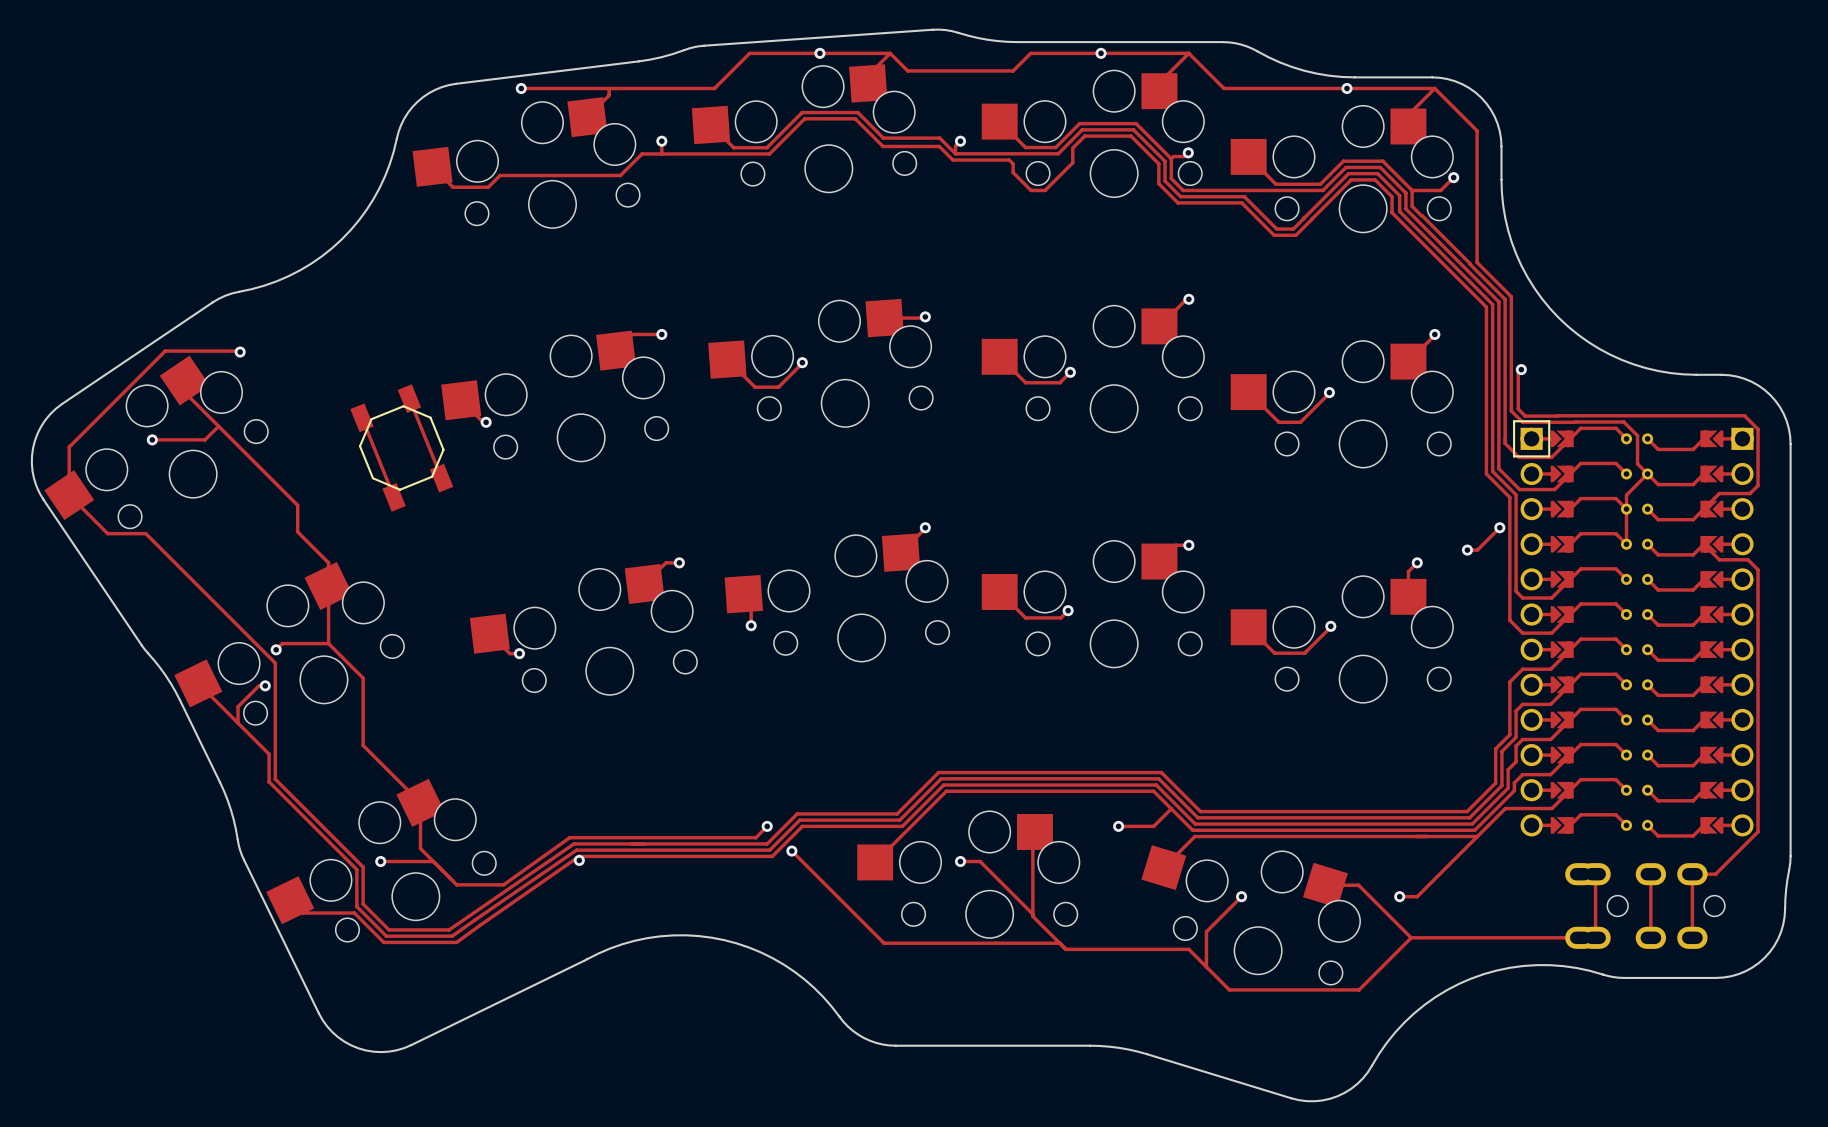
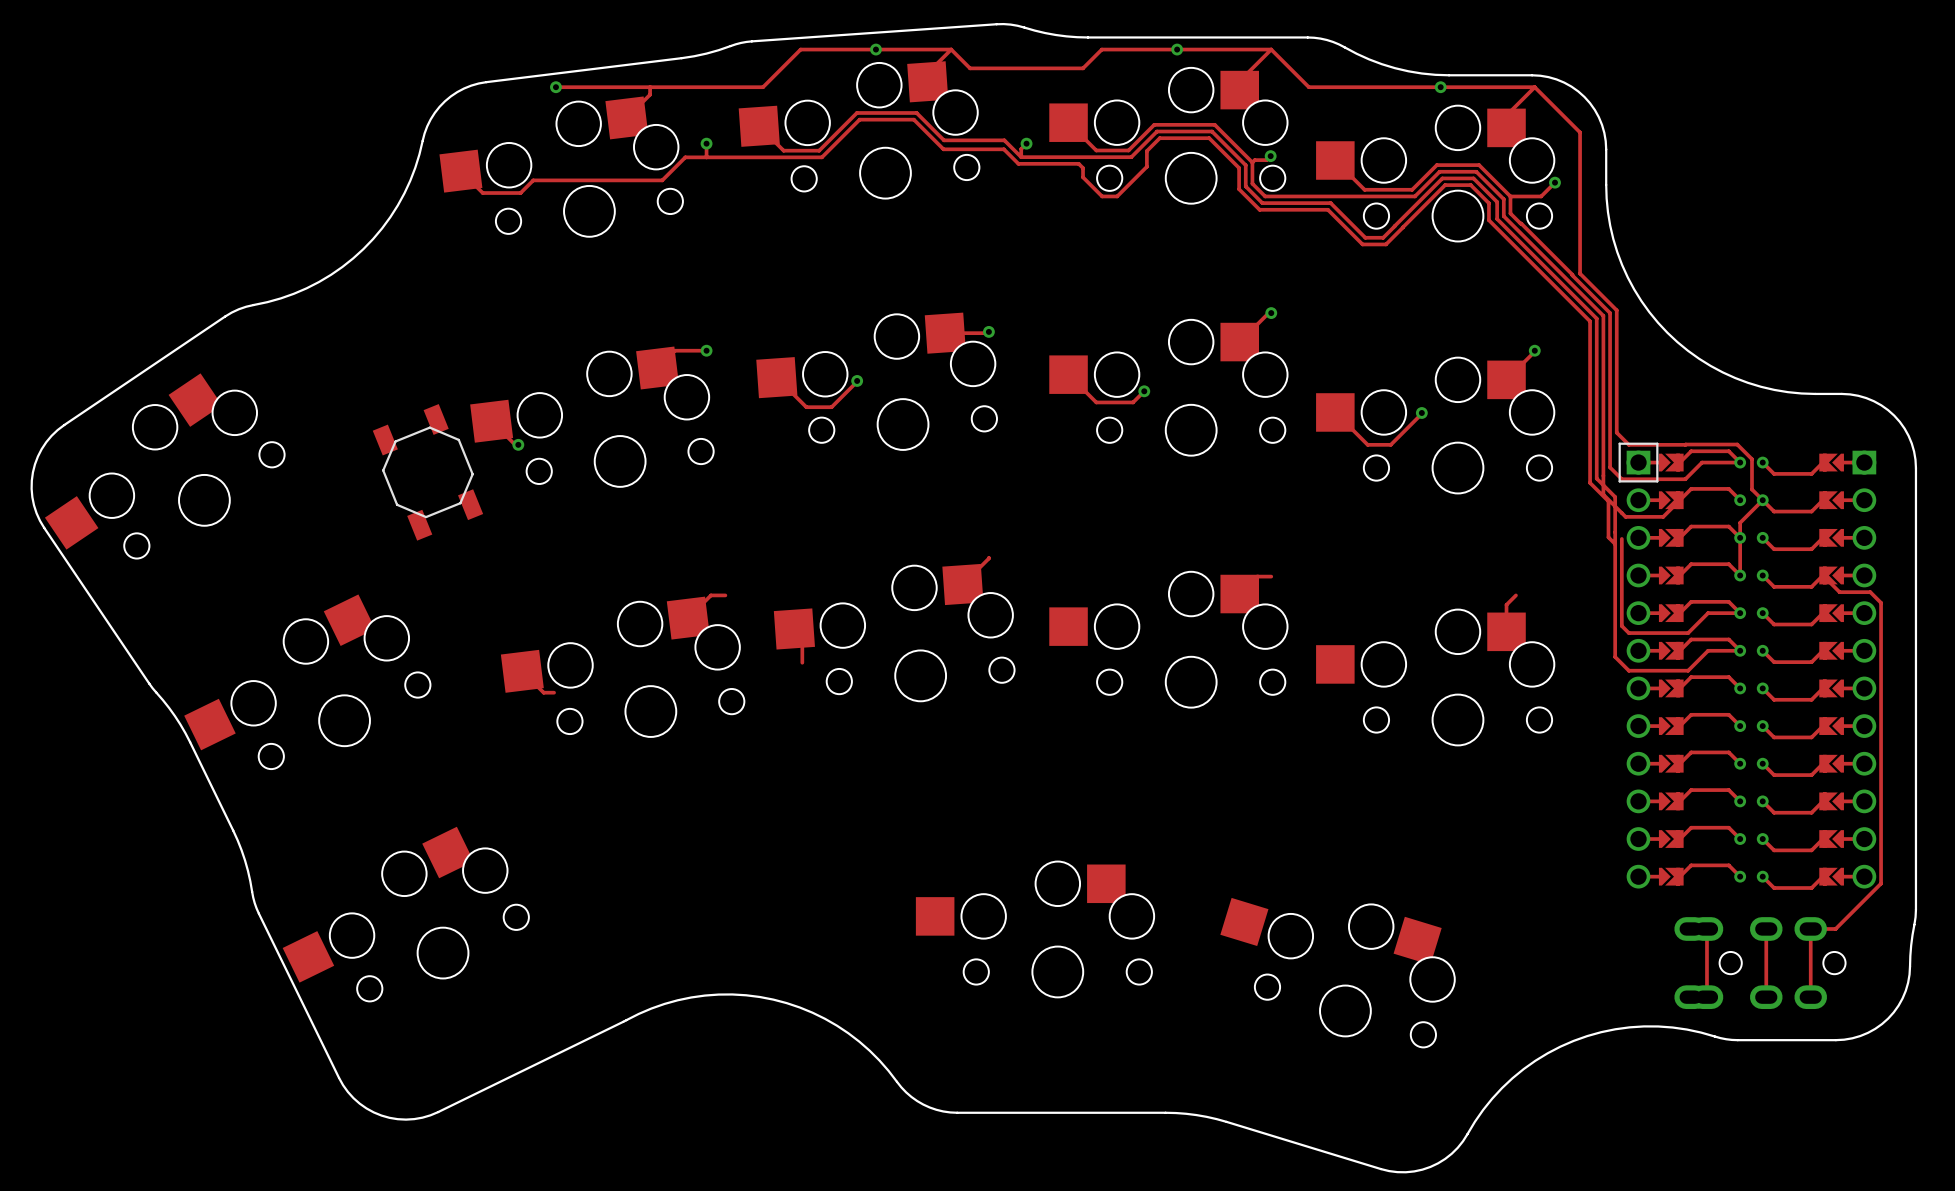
track: (240, 352) (165, 351) (69, 447) (69, 495) (107, 533) (145, 533) (275, 663) (275, 779) (363, 867) (363, 904) (388, 929) (449, 929) (573, 843) (767, 843) (797, 813) (897, 813) (938, 772) (1161, 772) (1200, 811) (1467, 811) (1495, 783) (1495, 748) (1509, 734) (1509, 682) (1522, 669) (1550, 669) (1570, 649) -> none
via: (240, 352) -> none
track: (1521, 369) (1518, 372) (1518, 409) (1525, 416) (1744, 415) (1758, 429) (1758, 485) (1750, 493) (1719, 493) (1703, 509) -> none
via: (1521, 369) -> none
track: (184, 380) (184, 392) (297, 505) (297, 531) (328, 562) (328, 643) -> none
track: (409, 398) (441, 478) -> none
track: (361, 417) (394, 497) -> none
track: (218, 426) (205, 439) (152, 439) -> none
track: (1570, 438) (1551, 457) (1519, 457) (1516, 454) -> (1740, 462) (1702, 462) (1685, 479) (1621, 479)
via: (152, 439) -> none
track: (1492, 453) (1492, 471) (1516, 494) (1516, 510) -> none
track: (1486, 457) (1486, 473) (1509, 497) -> (1596, 478) (1615, 497) (1615, 525)
track: none -> (1590, 482) (1608, 501) (1608, 537) (1615, 544)
via: (925, 527) -> none
track: (1499, 527) (1477, 550) (1467, 550) -> none
via: (1499, 527) -> none
via: (1188, 545) -> none
via: (1467, 550) -> none
via: (679, 562) -> none
via: (1417, 562) -> none
track: (1570, 579) (1551, 597) -> (1740, 613) (1708, 613) (1688, 633) (1659, 633)
track: (999, 591) (1025, 617) (1060, 617) (1068, 610) -> none
via: (1068, 610) -> none
track: (1570, 614) (1551, 633) -> (1740, 650) (1708, 650) (1688, 670) (1659, 670)
via: (751, 625) -> none
track: (1330, 626) (1304, 653) (1274, 653) (1248, 627) -> none
via: (1330, 626) -> none
track: (328, 643) (363, 678) (363, 745) (420, 802) (420, 848) (456, 884) (503, 884) (569, 837) (755, 837) (767, 826) -> none
track: (328, 643) (282, 643) (276, 649) -> none
via: (276, 649) -> none
via: (519, 653) -> none
track: (198, 683) (269, 754) (269, 781) (356, 869) (356, 906) (386, 936) (452, 936) (576, 850) (769, 850) (799, 820) (899, 820) (941, 778) (1158, 778) (1197, 817) (1469, 817) (1501, 785) (1501, 751) (1516, 737) (1516, 710) (1522, 704) (1550, 704) (1570, 684) -> none
track: (265, 685) (258, 685) (238, 706) (238, 723) -> none
via: (265, 685) -> none
track: (1570, 719) (1550, 739) (1522, 739) (1516, 746) (1516, 761) (1508, 769) (1508, 788) (1472, 824) (1195, 824) (1156, 785) (943, 785) (902, 826) (802, 826) (772, 856) (579, 856) (456, 942) (383, 942) (354, 913) (303, 913) (290, 900) -> none
track: (1570, 755) (1550, 774) (1522, 774) (1514, 782) (1514, 790) (1474, 830) (1192, 830) (1153, 791) (946, 791) (875, 862) -> none
track: (1570, 790) (1551, 808) (1505, 808) (1417, 896) (1399, 896) -> none
track: (1171, 808) (1153, 826) (1118, 826) -> none
via: (767, 826) -> none
via: (1118, 826) -> none
track: (1034, 832) (1032, 834) (1032, 916) (1065, 949) (1188, 949) (1229, 989) (1359, 989) (1411, 937) -> none
track: (1477, 836) (1194, 836) (1163, 867) -> none
track: (791, 851) (884, 943) (1059, 943) -> none
via: (791, 851) -> none
via: (579, 860) -> none
track: (380, 861) (433, 861) -> none
via: (380, 861) -> none
track: (960, 861) (980, 861) (1032, 914) -> none
via: (960, 861) -> none
track: (1325, 885) (1358, 885) (1411, 937) -> none
track: (1241, 896) (1206, 931) (1206, 966) -> none
via: (1241, 896) -> none
via: (1399, 896) -> none
track: (1411, 937) (1580, 937) -> none

